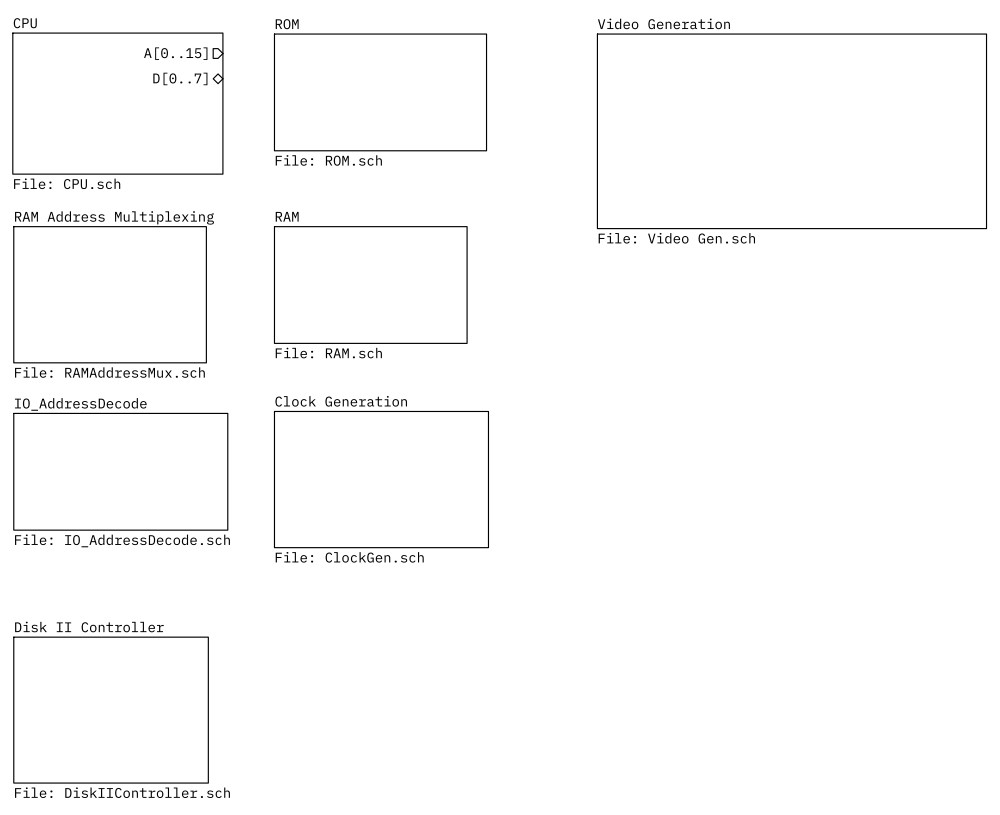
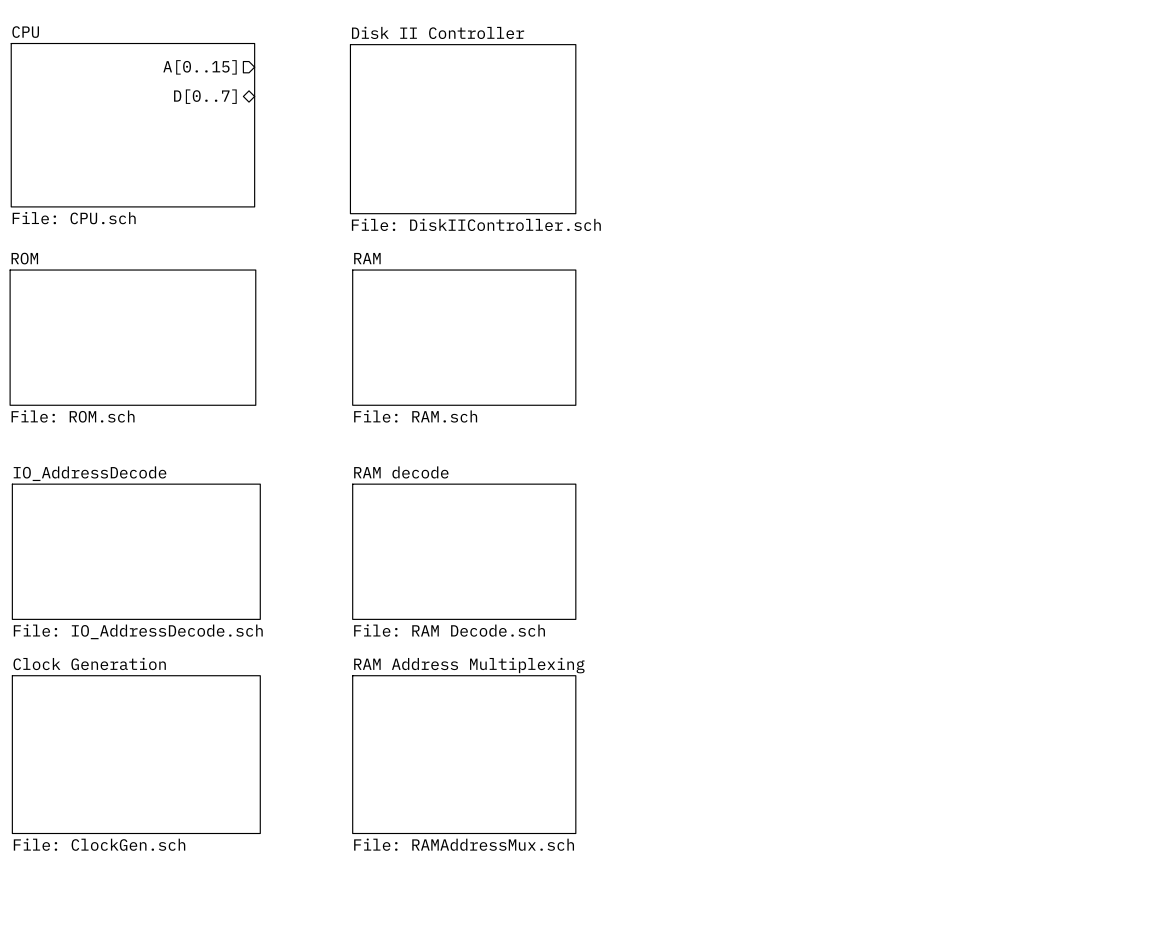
sheet ROM: File: ROM.sch (380, 92) -> none
sheet Disk II Controller: none -> File: DiskIIController.sch (463, 129)
sheet Video Generation: File: Video Gen.sch (791, 131) -> none
sheet RAM position: (370, 285) -> (464, 337)
sheet ROM: none -> File: ROM.sch (132, 337)
sheet RAM Address Multiplexing: File: RAMAddressMux.sch (110, 294) -> none
sheet RAM decode: none -> File: RAM Decode.sch (464, 551)
sheet Clock Generation: File: ClockGen.sch (381, 479) -> none
sheet Clock Generation: none -> File: ClockGen.sch (136, 754)
sheet RAM Address Multiplexing: none -> File: RAMAddressMux.sch (464, 754)
sheet Disk II Controller: File: DiskIIController.sch (111, 710) -> none

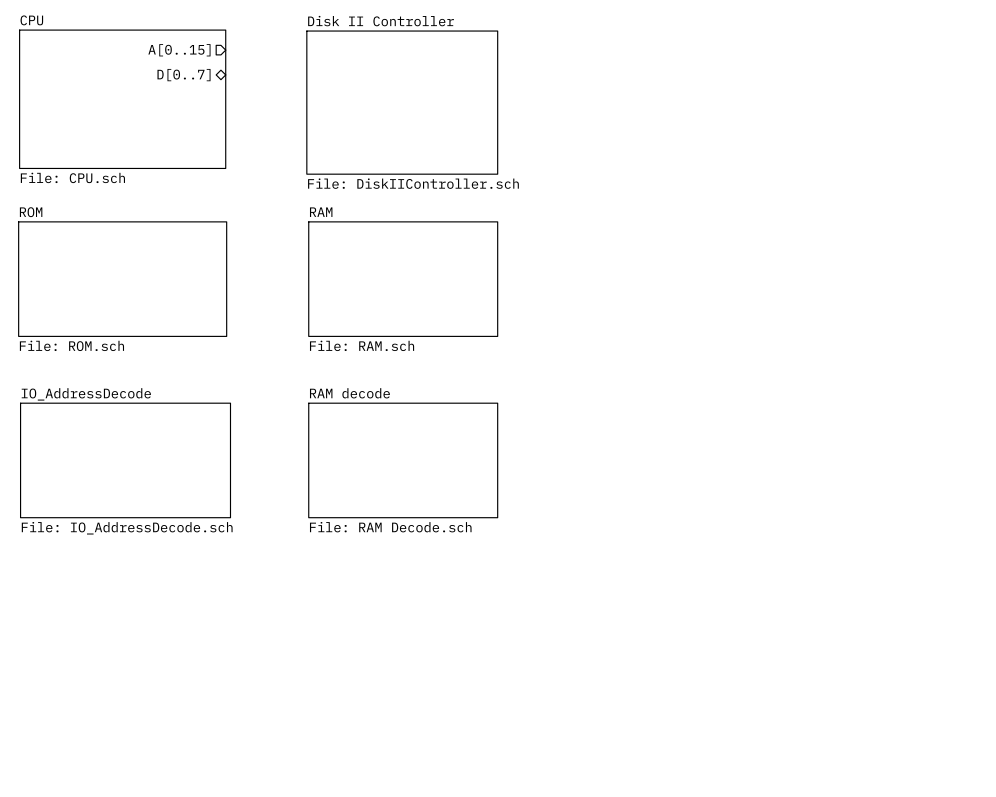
sheet Clock Generation: File: ClockGen.sch (136, 754) -> none
sheet RAM Address Multiplexing: File: RAMAddressMux.sch (464, 754) -> none

